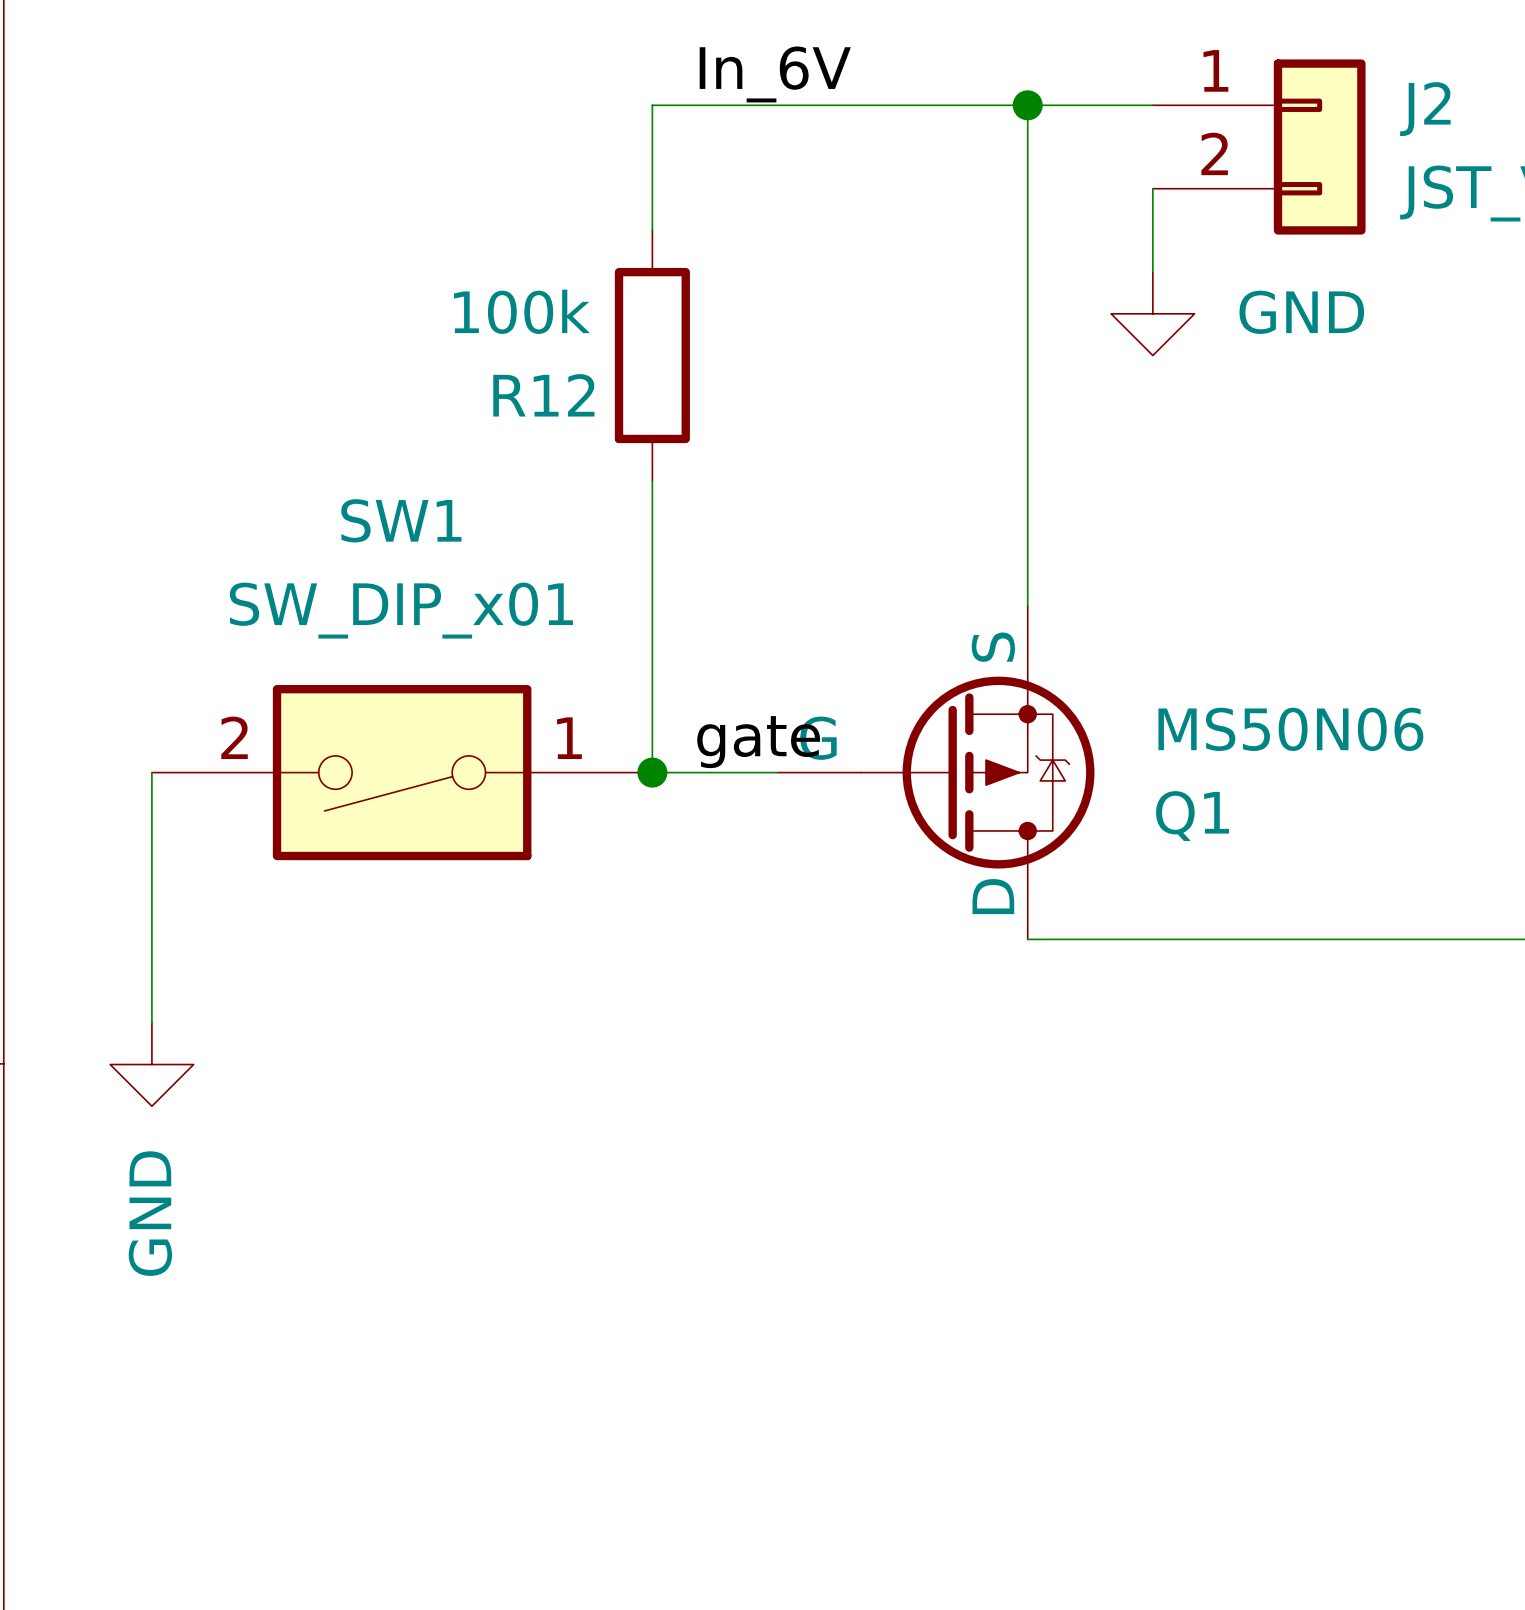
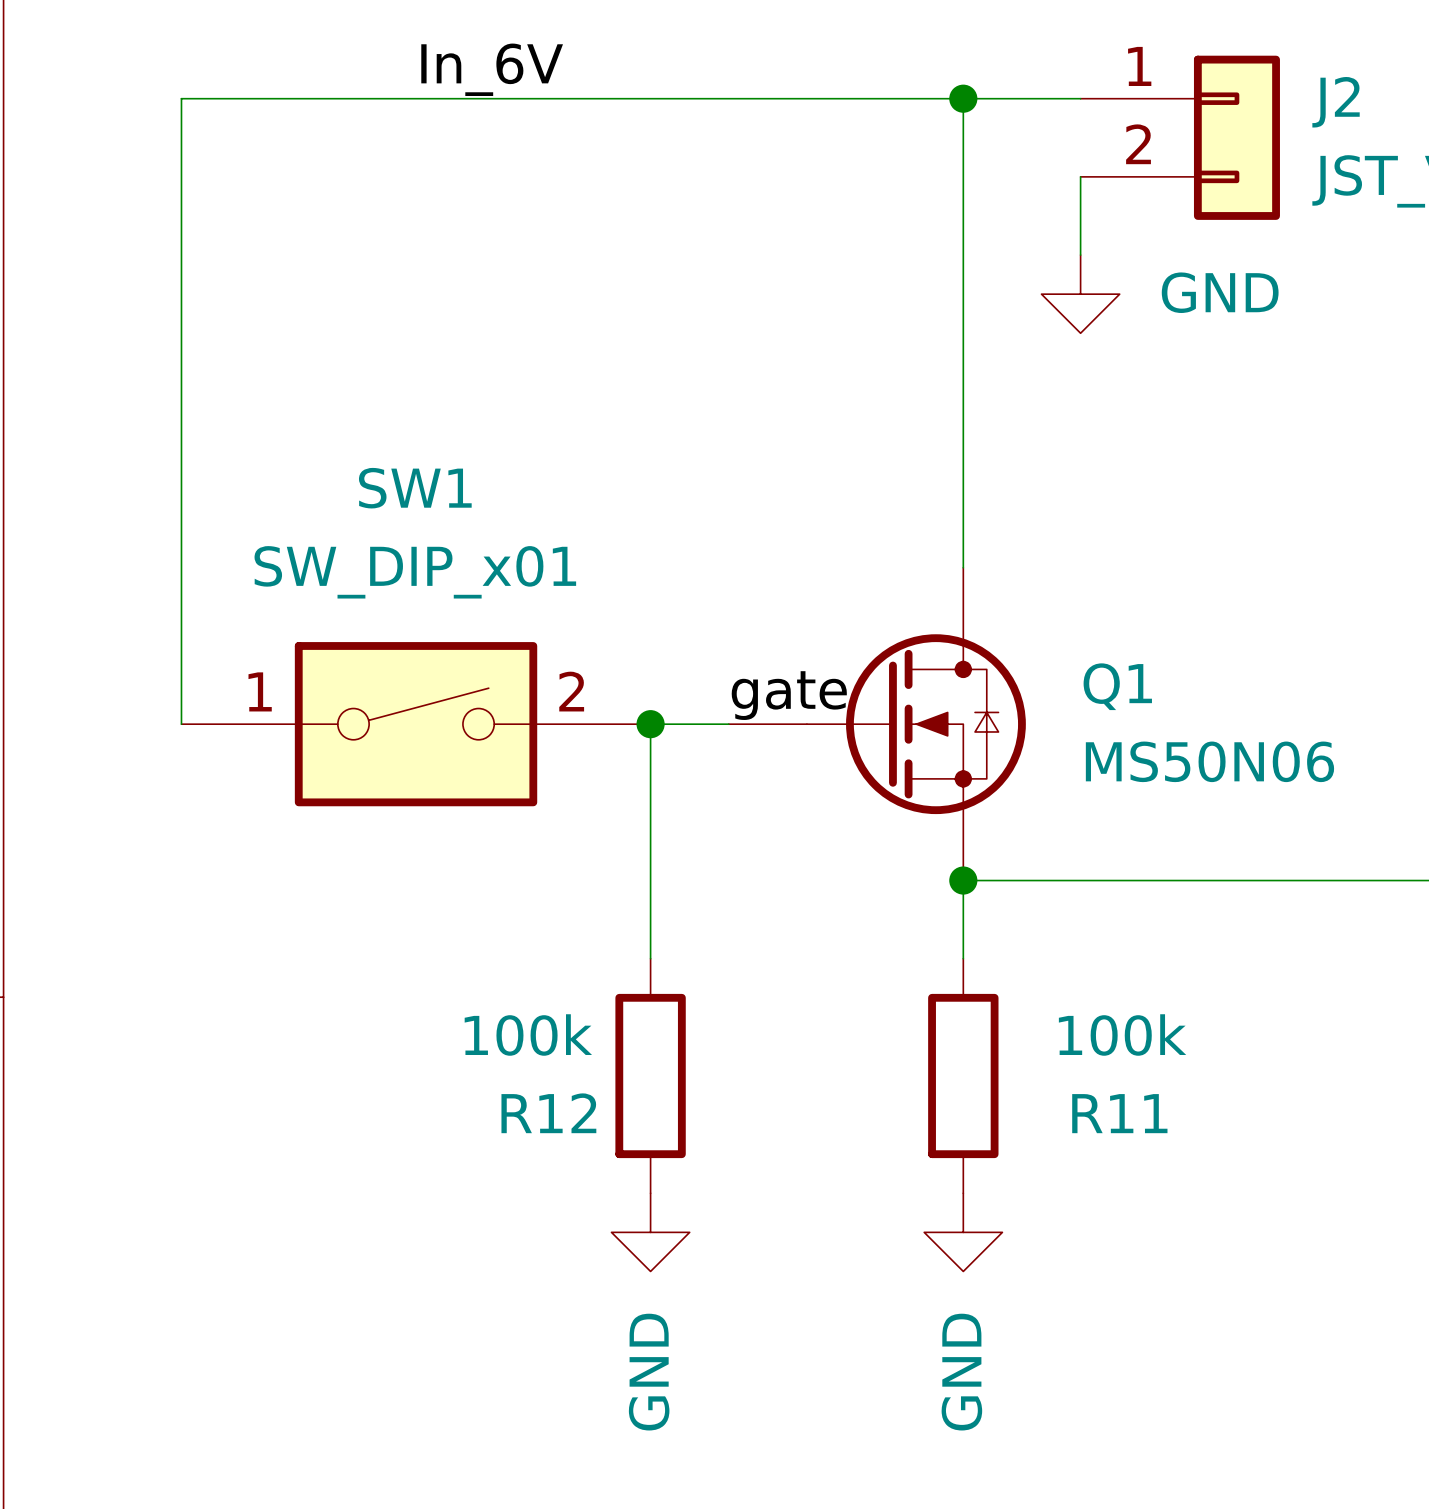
label position: In_6V (775, 74) -> In_6V (492, 69)
wire: (652, 105) (652, 230) -> (611, 98) (181, 98) (181, 724)
R12 position: (652, 355) -> (650, 1076)
wire: (652, 480) (652, 772) (694, 772) -> (650, 958) (650, 724)
Q1 symbol: [777, 605, 1095, 940] -> [728, 567, 1026, 881]
Q1 value position: MS50N06 (1290, 729) -> MS50N06 (1209, 761)
label position: gate (758, 742) -> gate (789, 695)
wire: (151, 772) (151, 1022) -> none
SW1 rotation: 0° (402, 772) -> 180° (416, 724)
junction position: (652, 772) -> (650, 724)
Q1 name position: Q1 (1192, 816) -> Q1 (1117, 686)
wire: none -> (963, 880) (963, 958)
junction: none -> (963, 880)
power symbol: GND (151, 1064) -> none
R11: none -> 100k (963, 1076)
power symbol: none -> GND (650, 1232)
power symbol: none -> GND (963, 1232)

